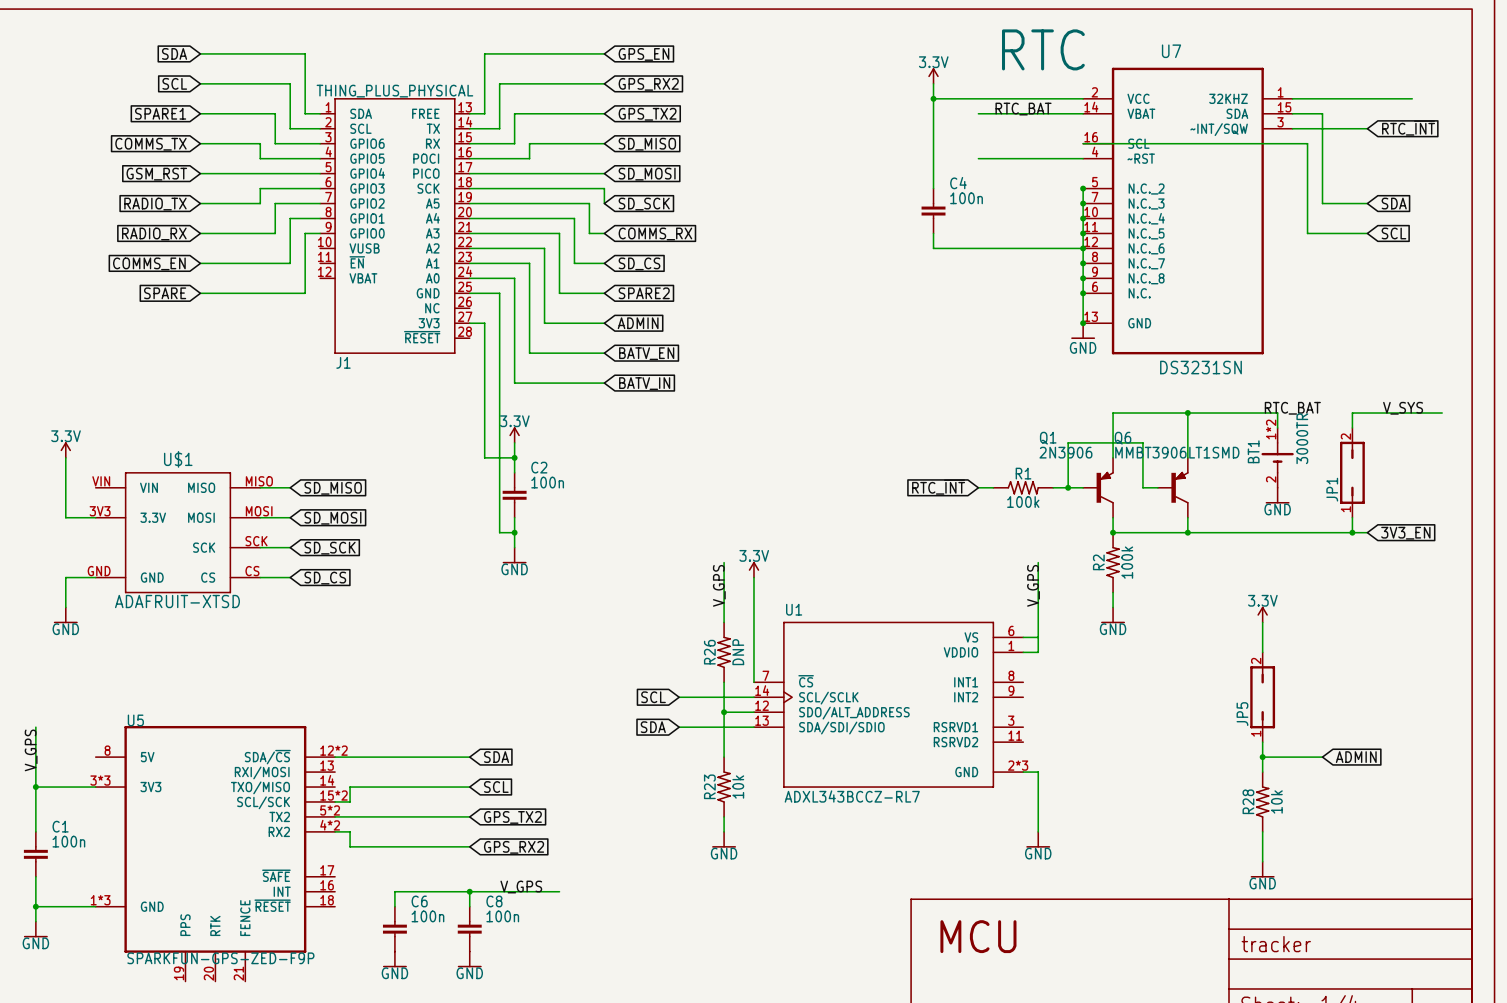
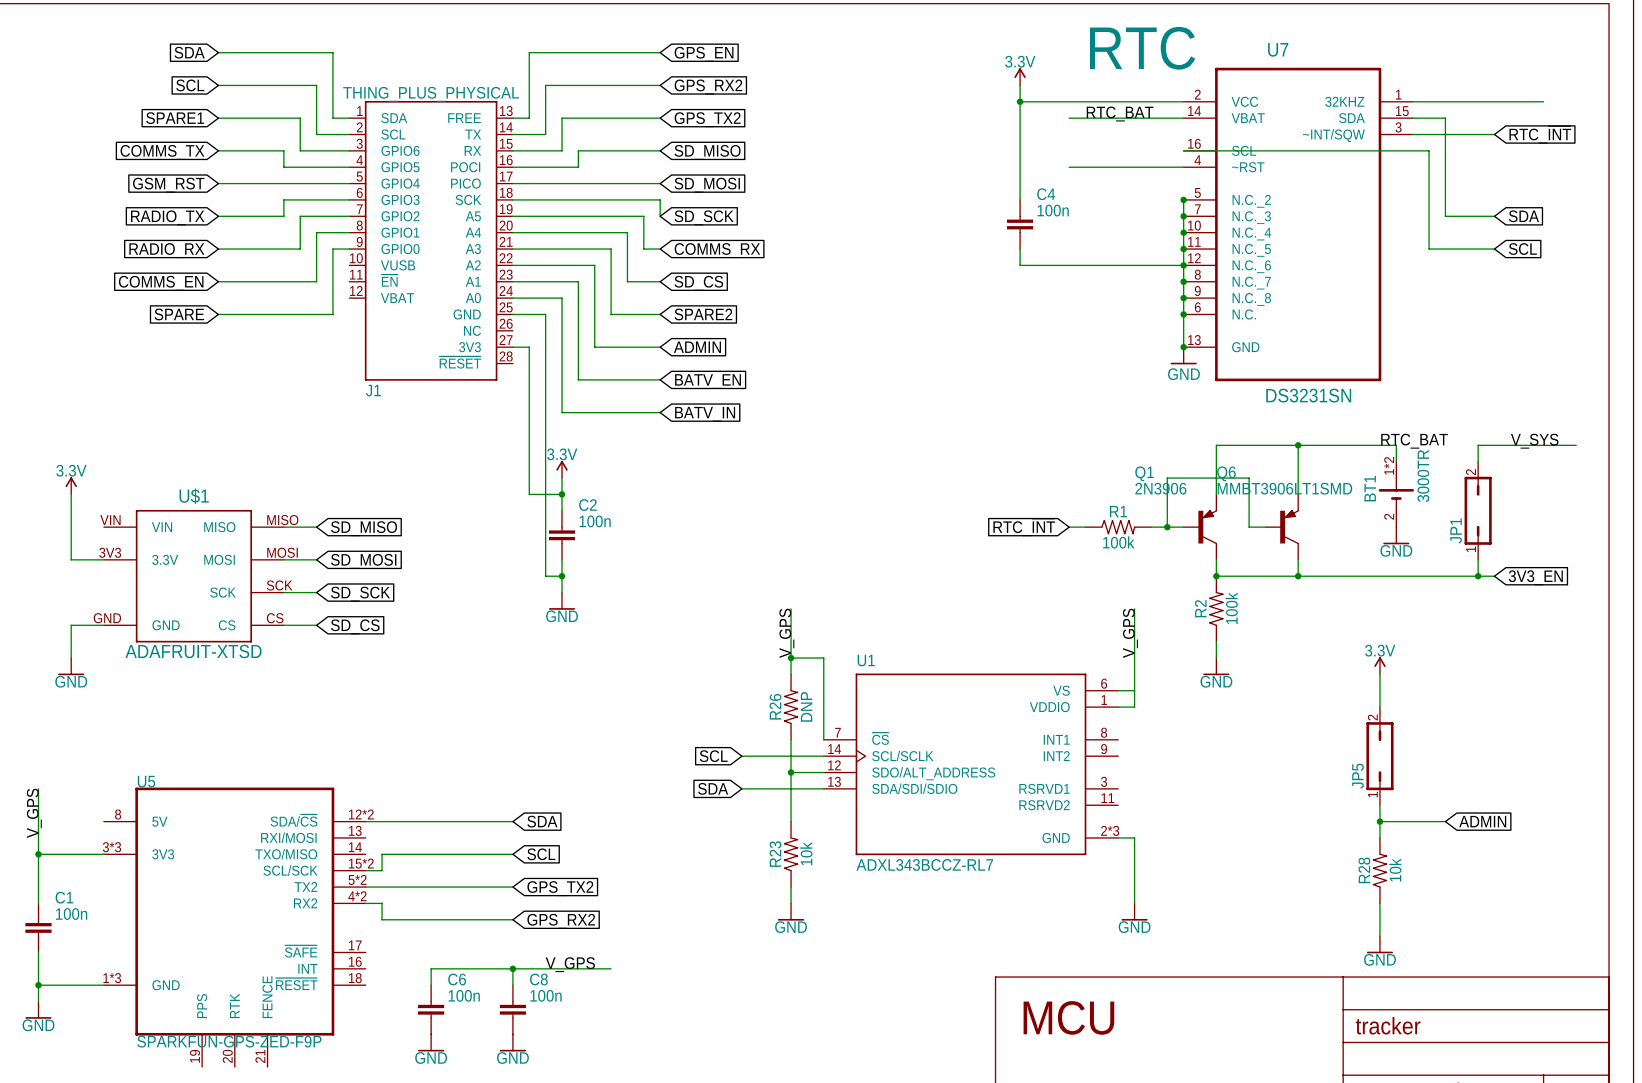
power symbol: 3.3V (753, 569) -> none
wire: (753, 577) (753, 607) -> (791, 658) (823, 658)
junction: none -> (791, 658)

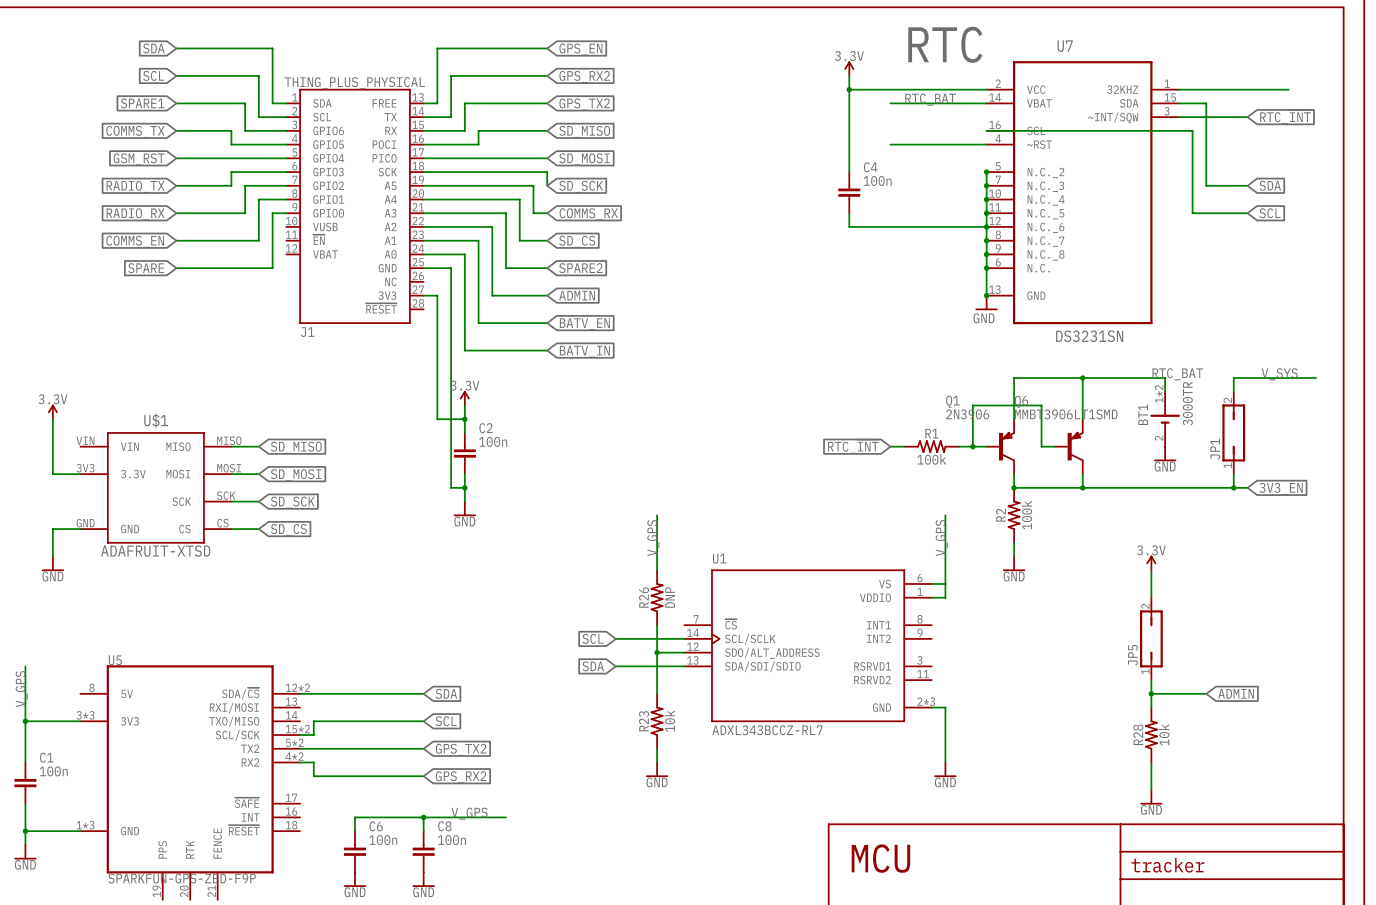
wire: (791, 658) (823, 658) (823, 739) -> none
junction: (791, 658) -> none

